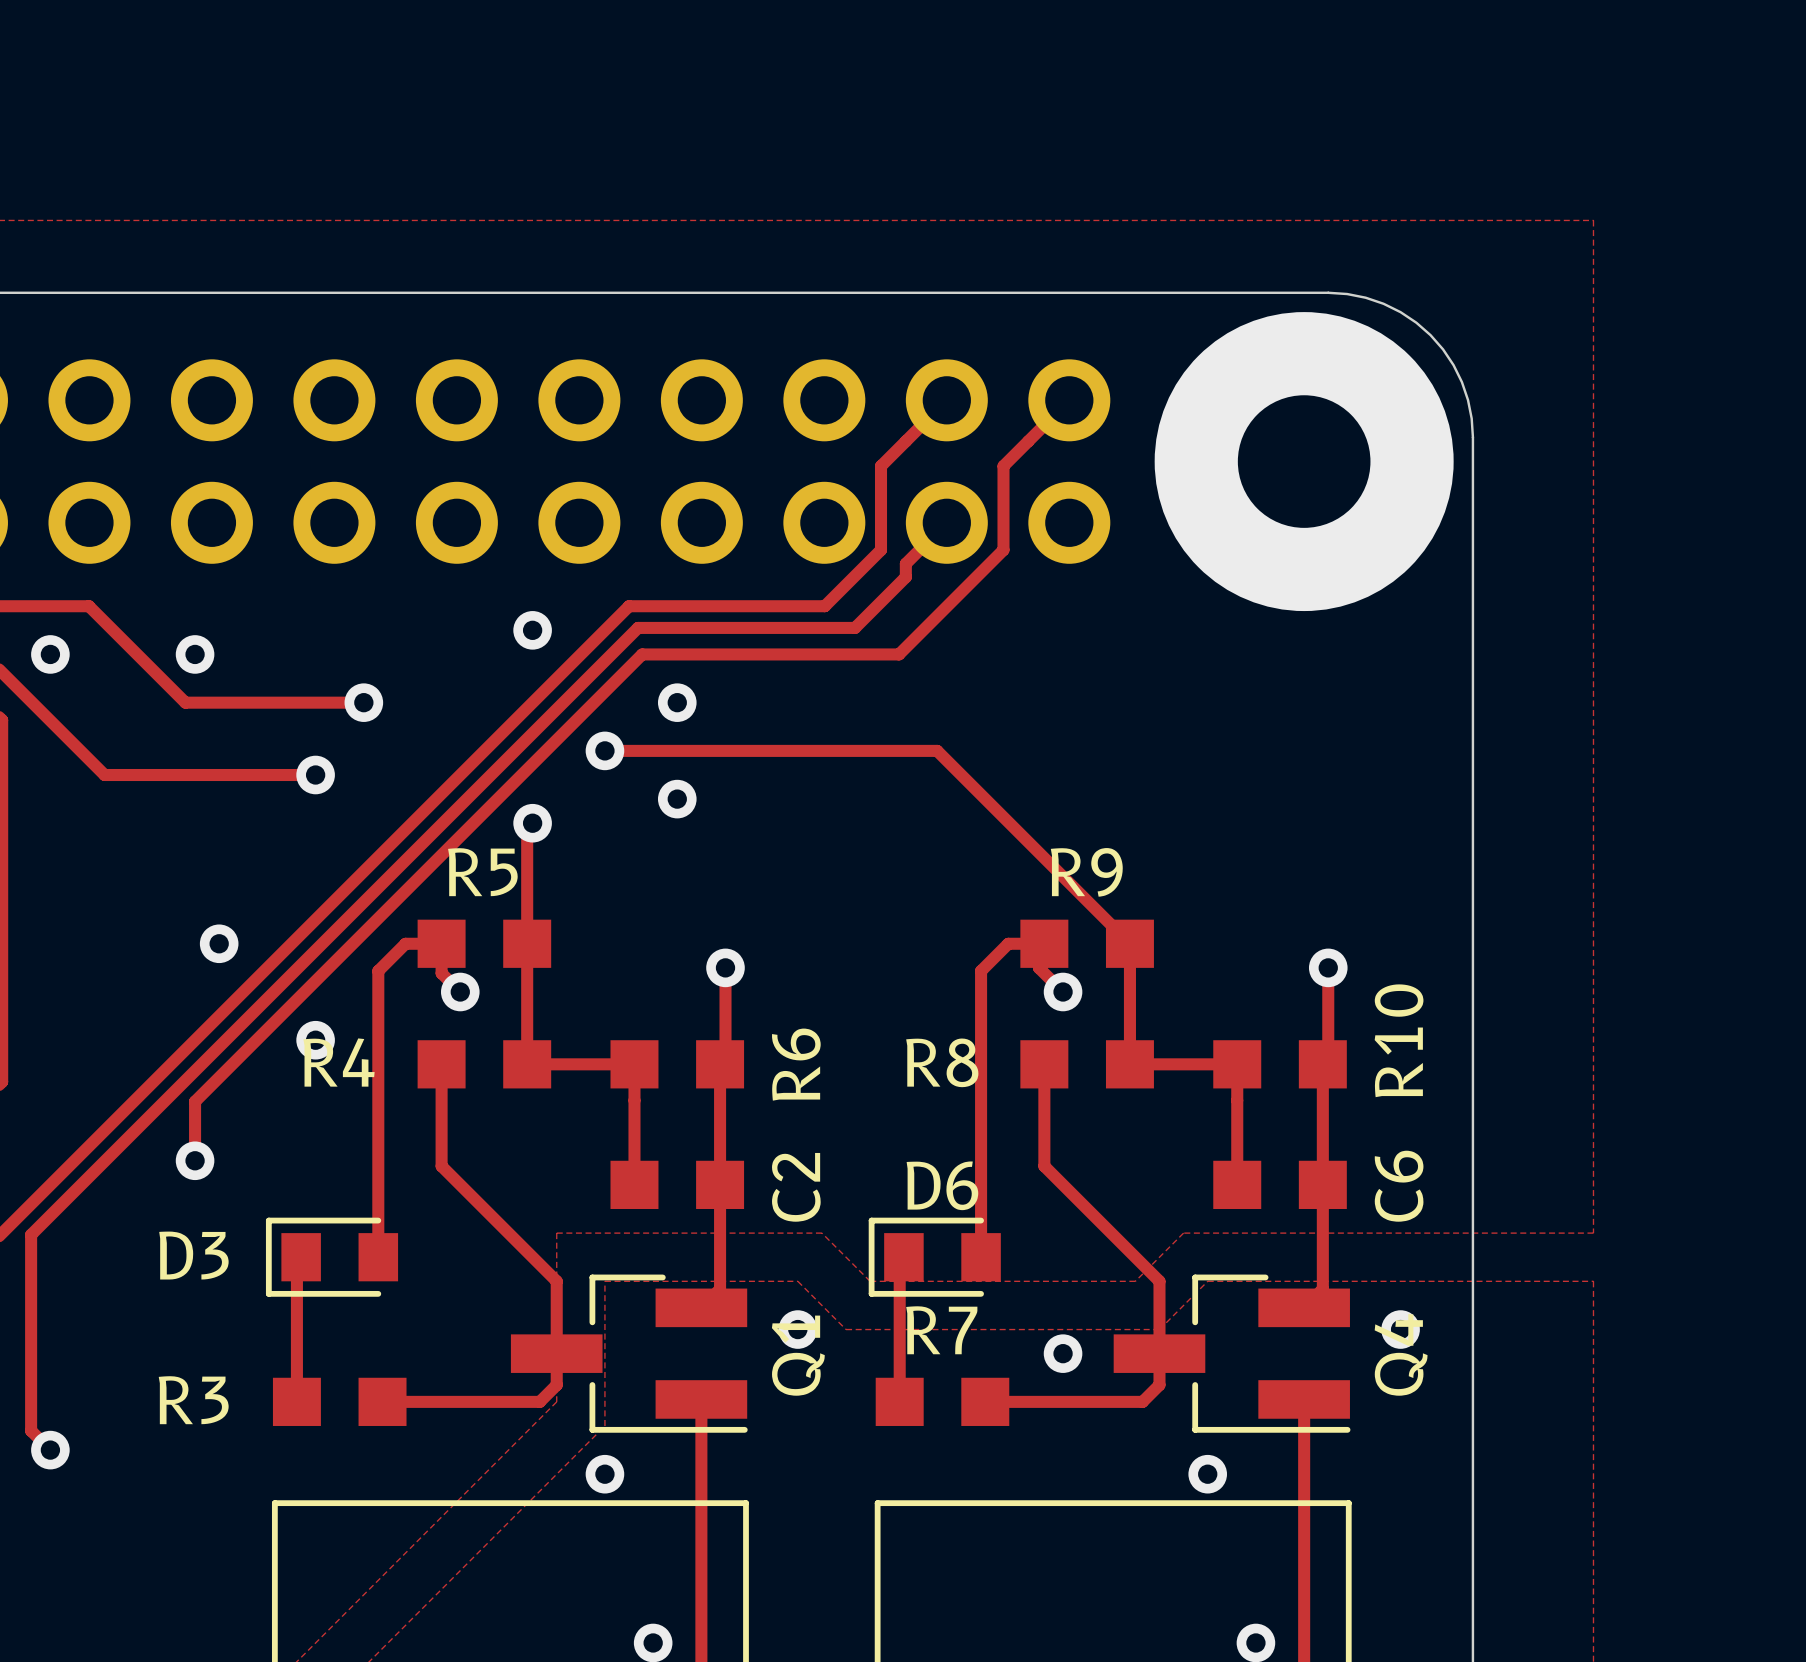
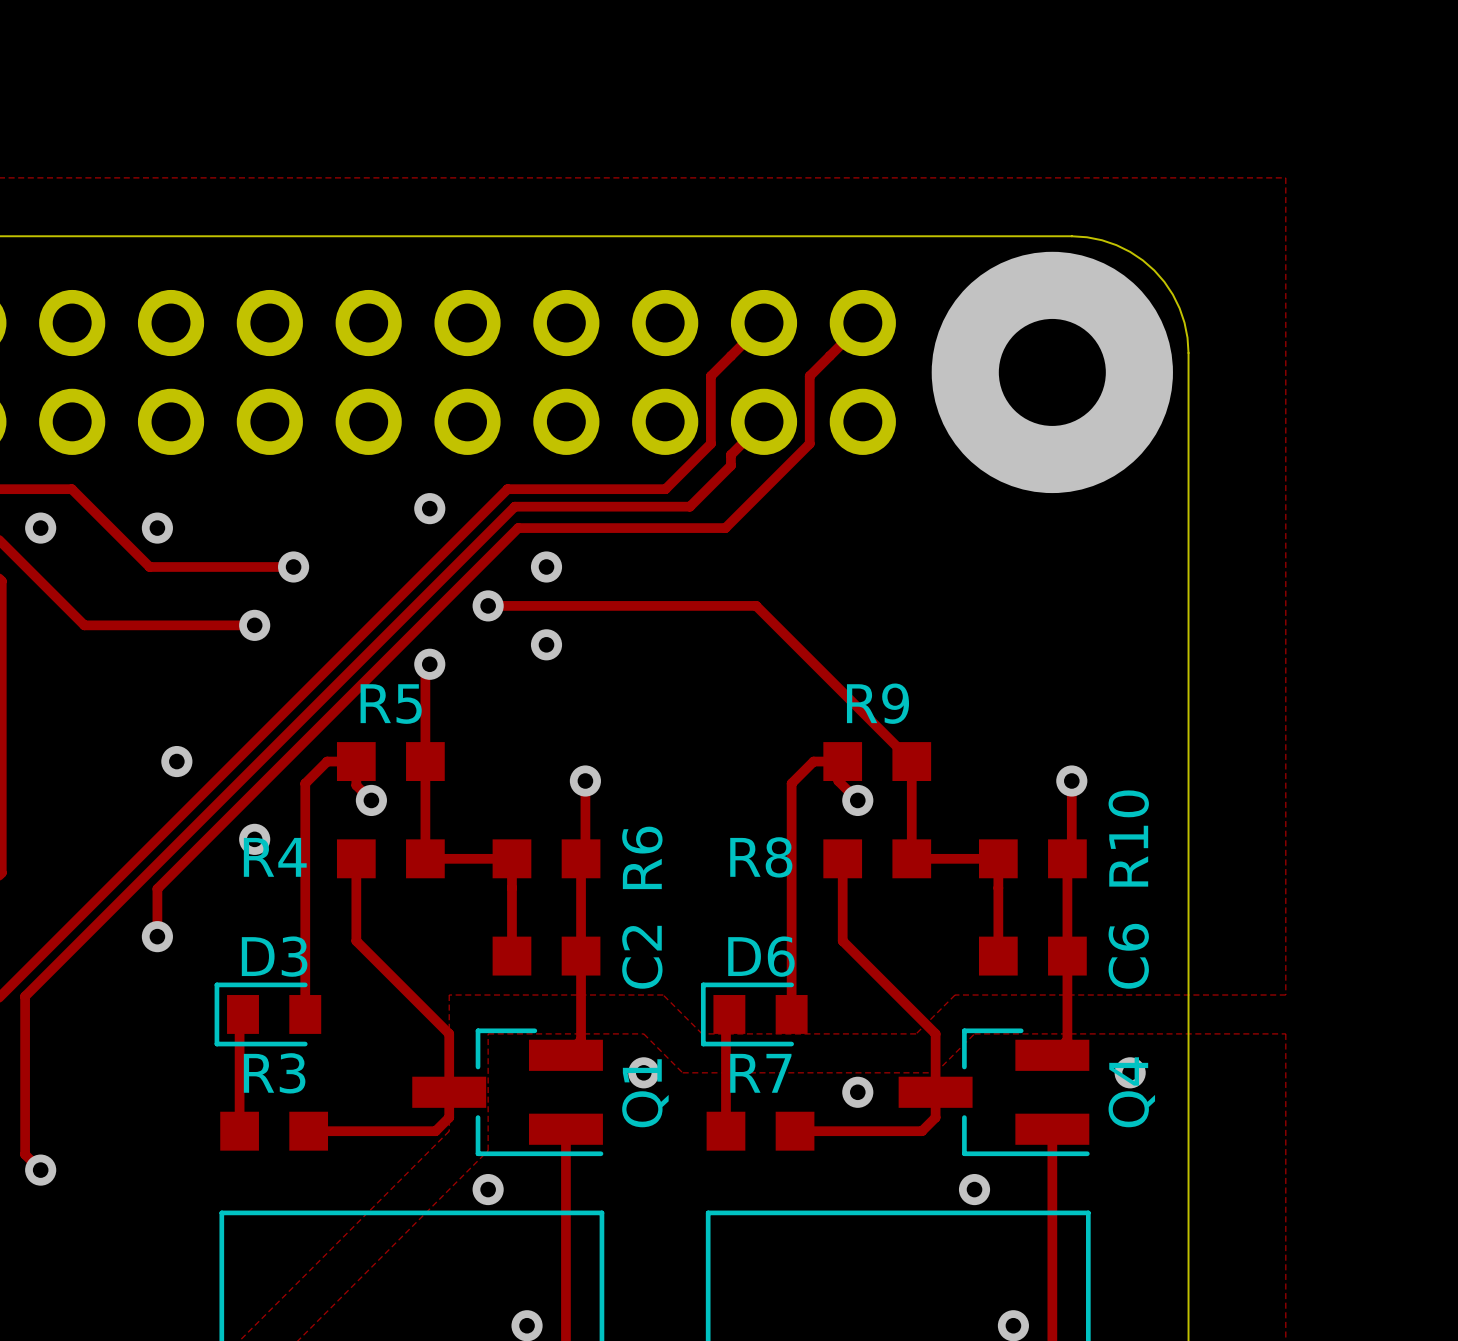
D3 name position: D3 (193, 1255) -> D3 (274, 956)
R3 name position: R3 (193, 1400) -> R3 (274, 1073)

